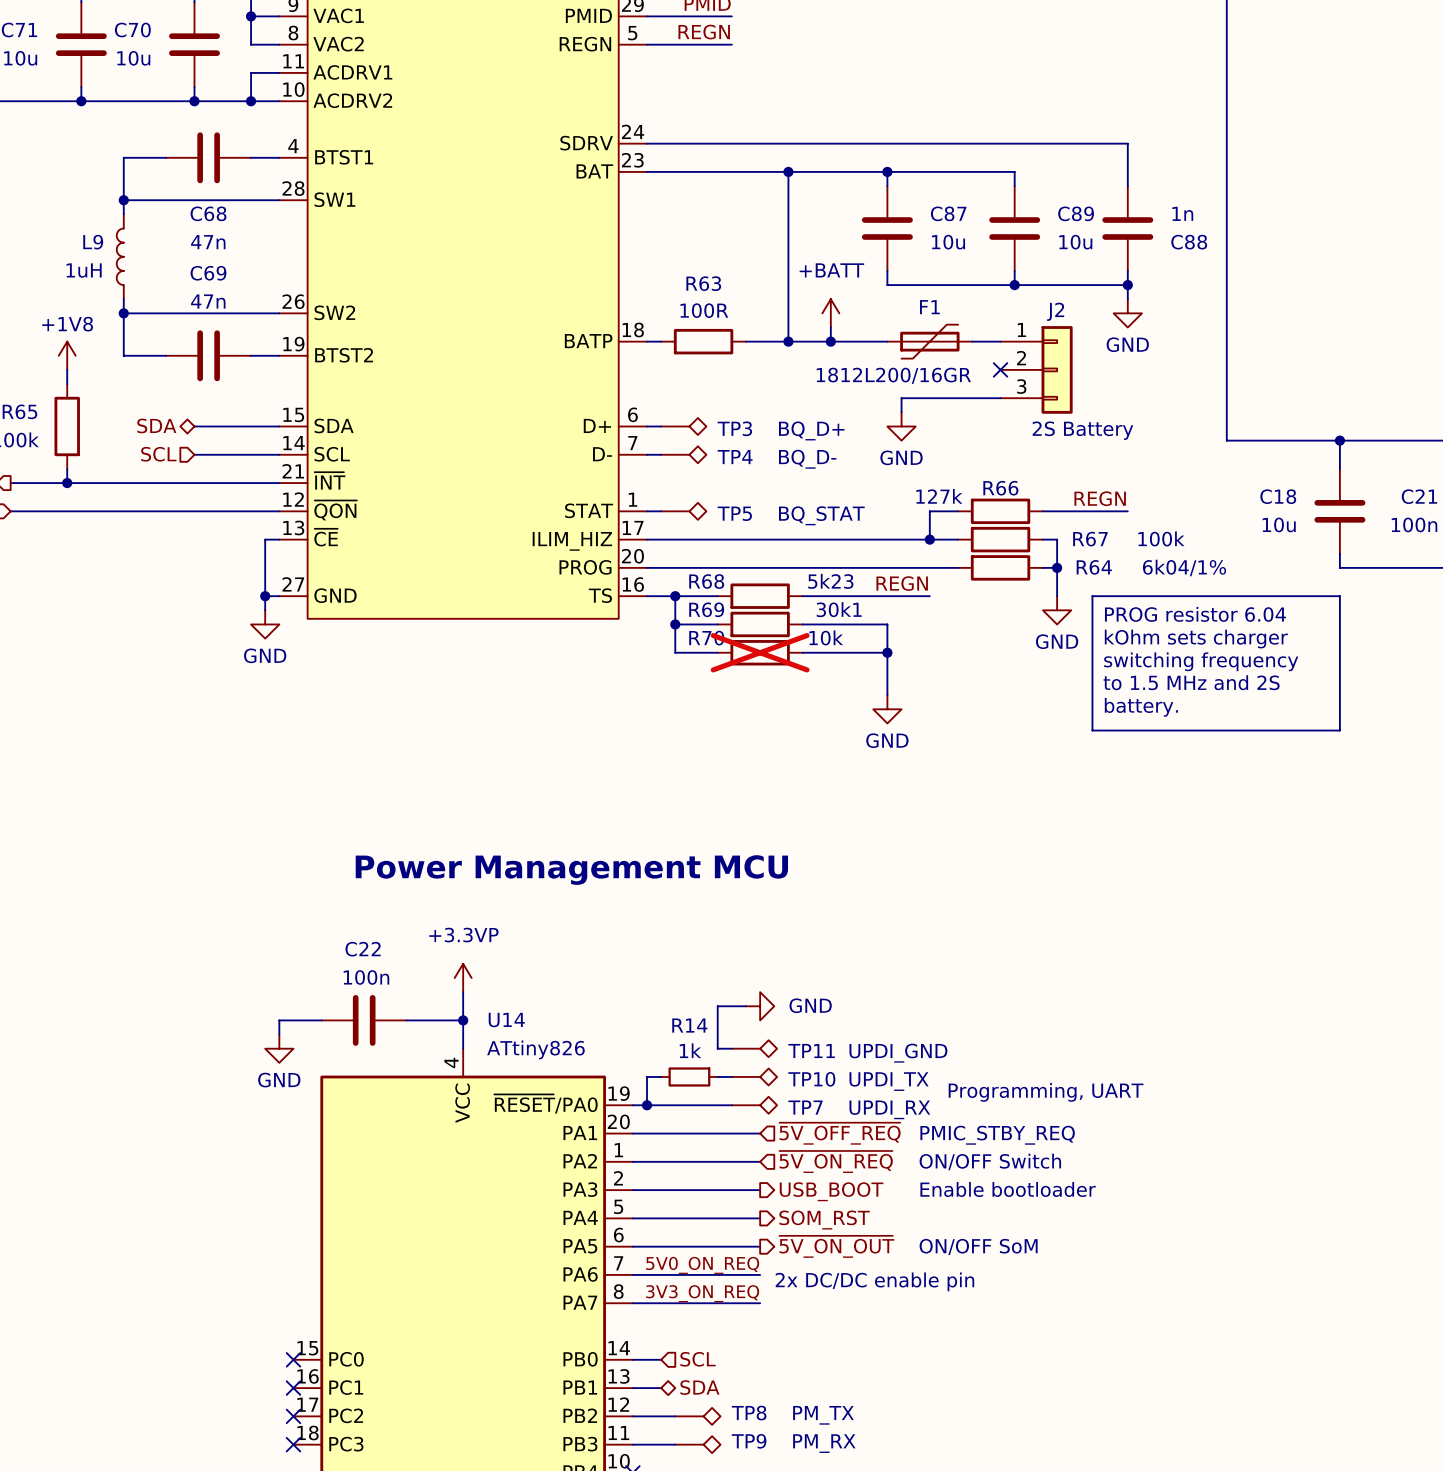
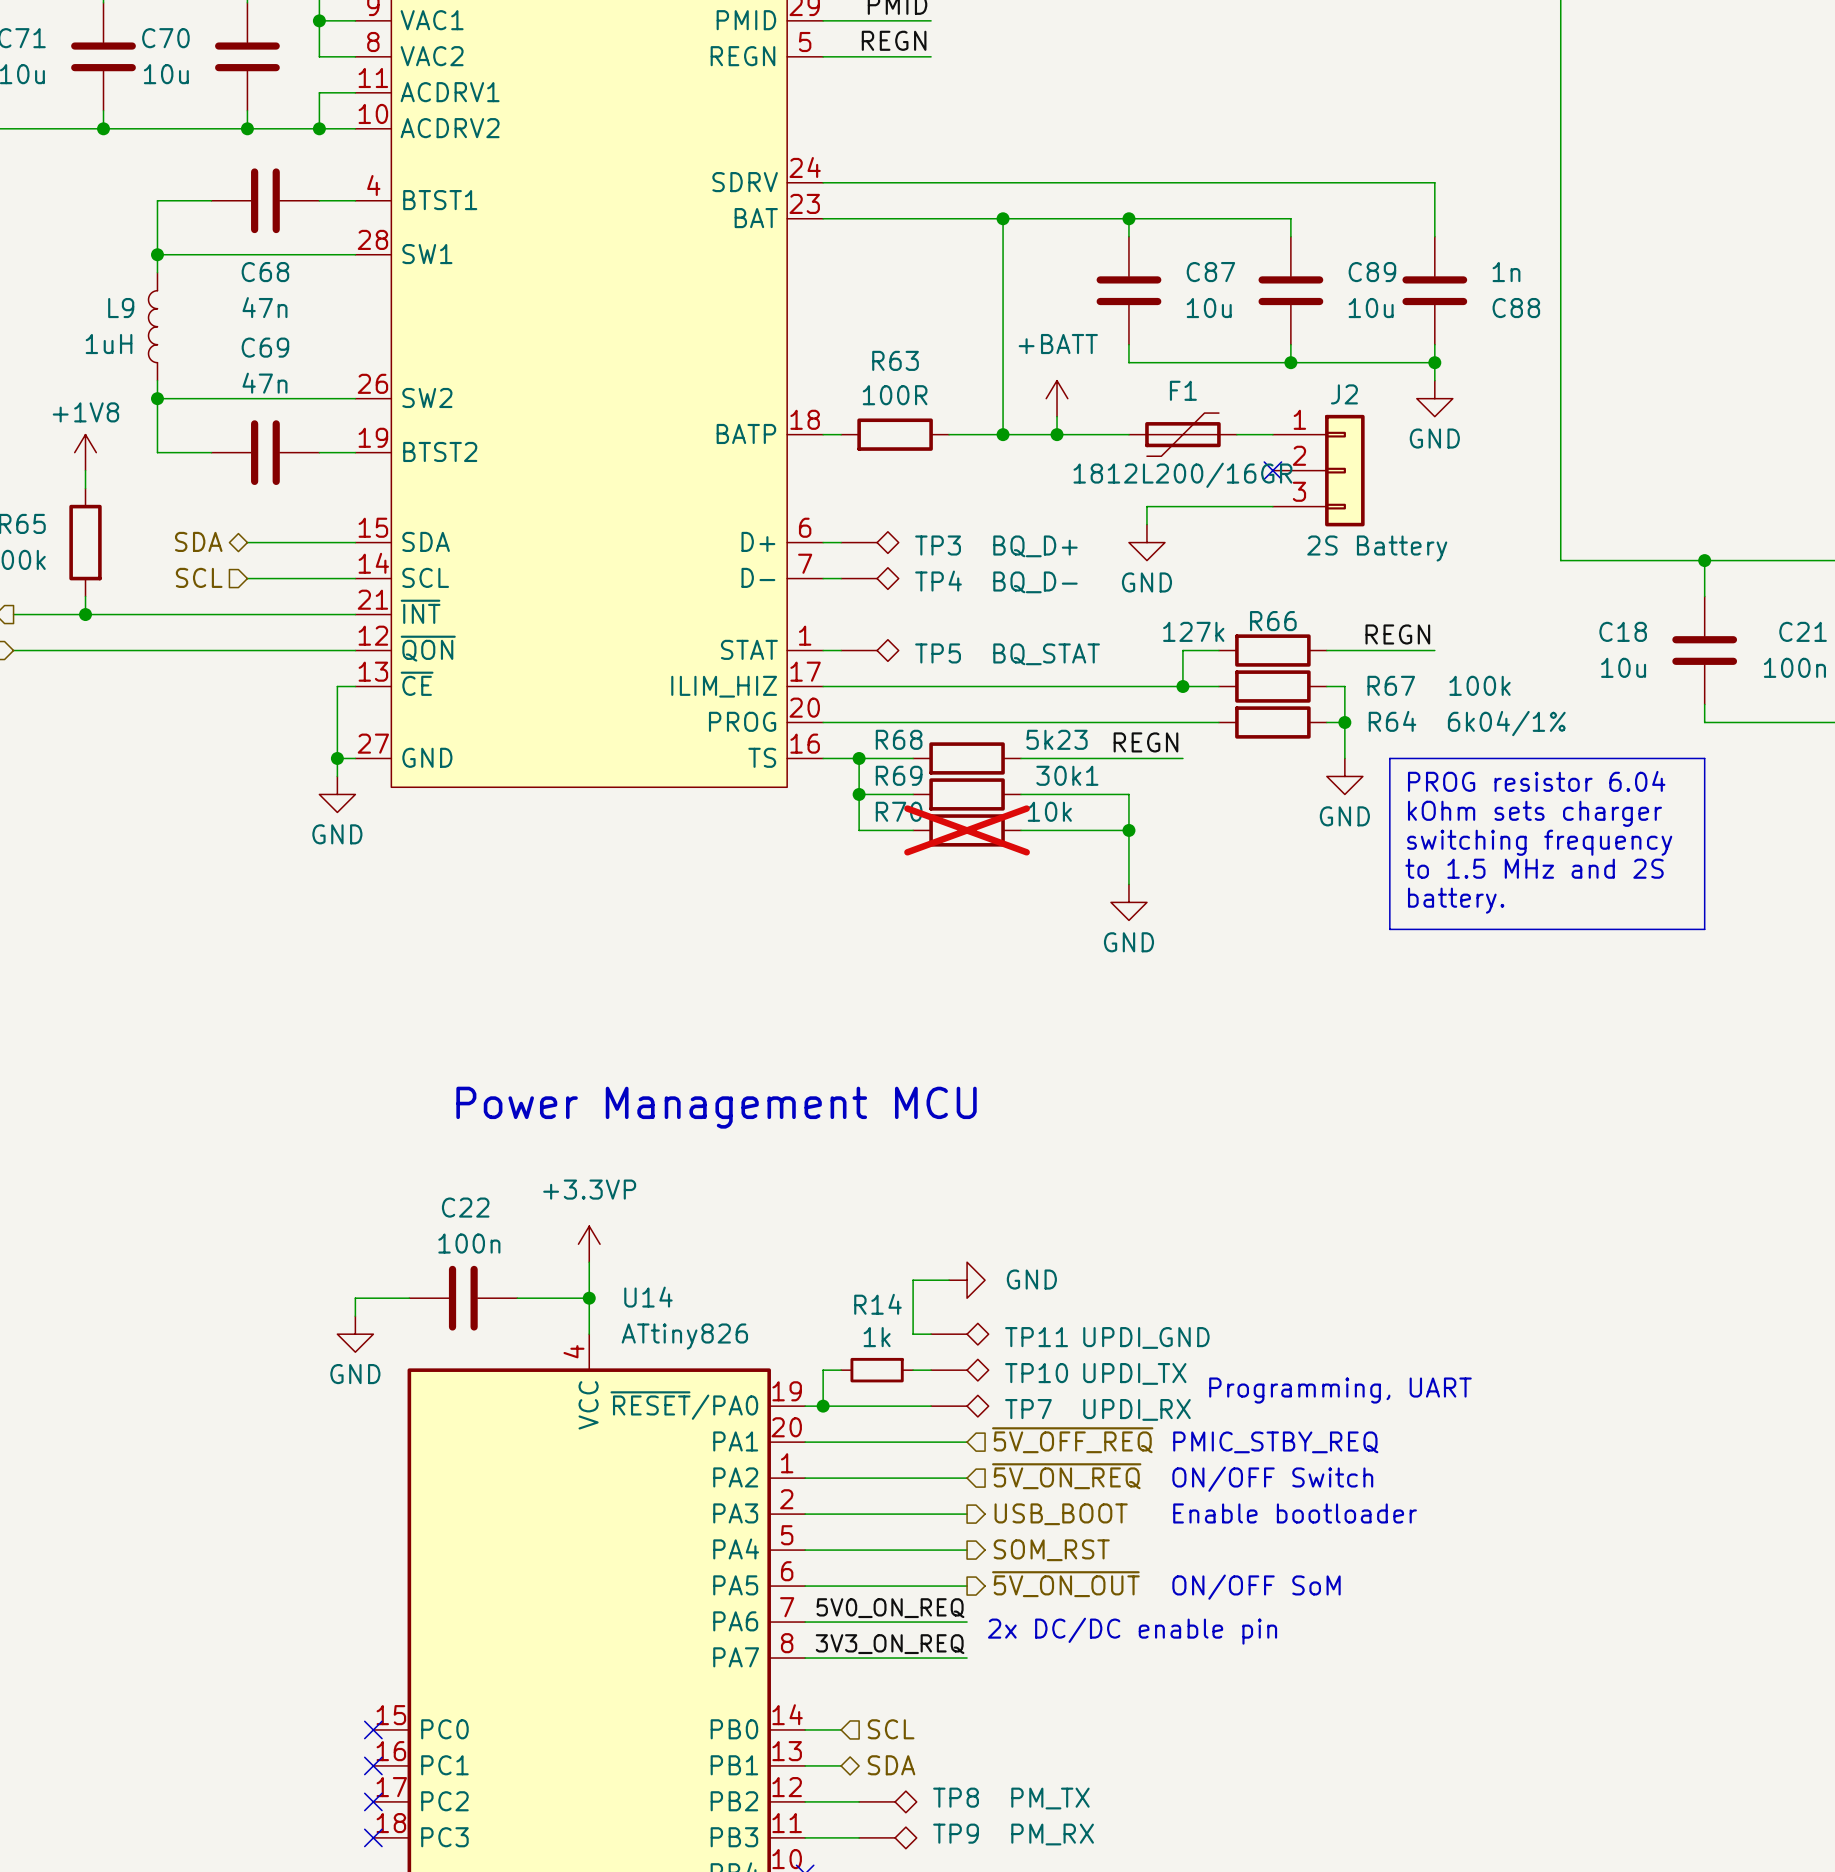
F1 value position: 1812L200/16GR (893, 375) -> 1812L200/16GR (1182, 475)

